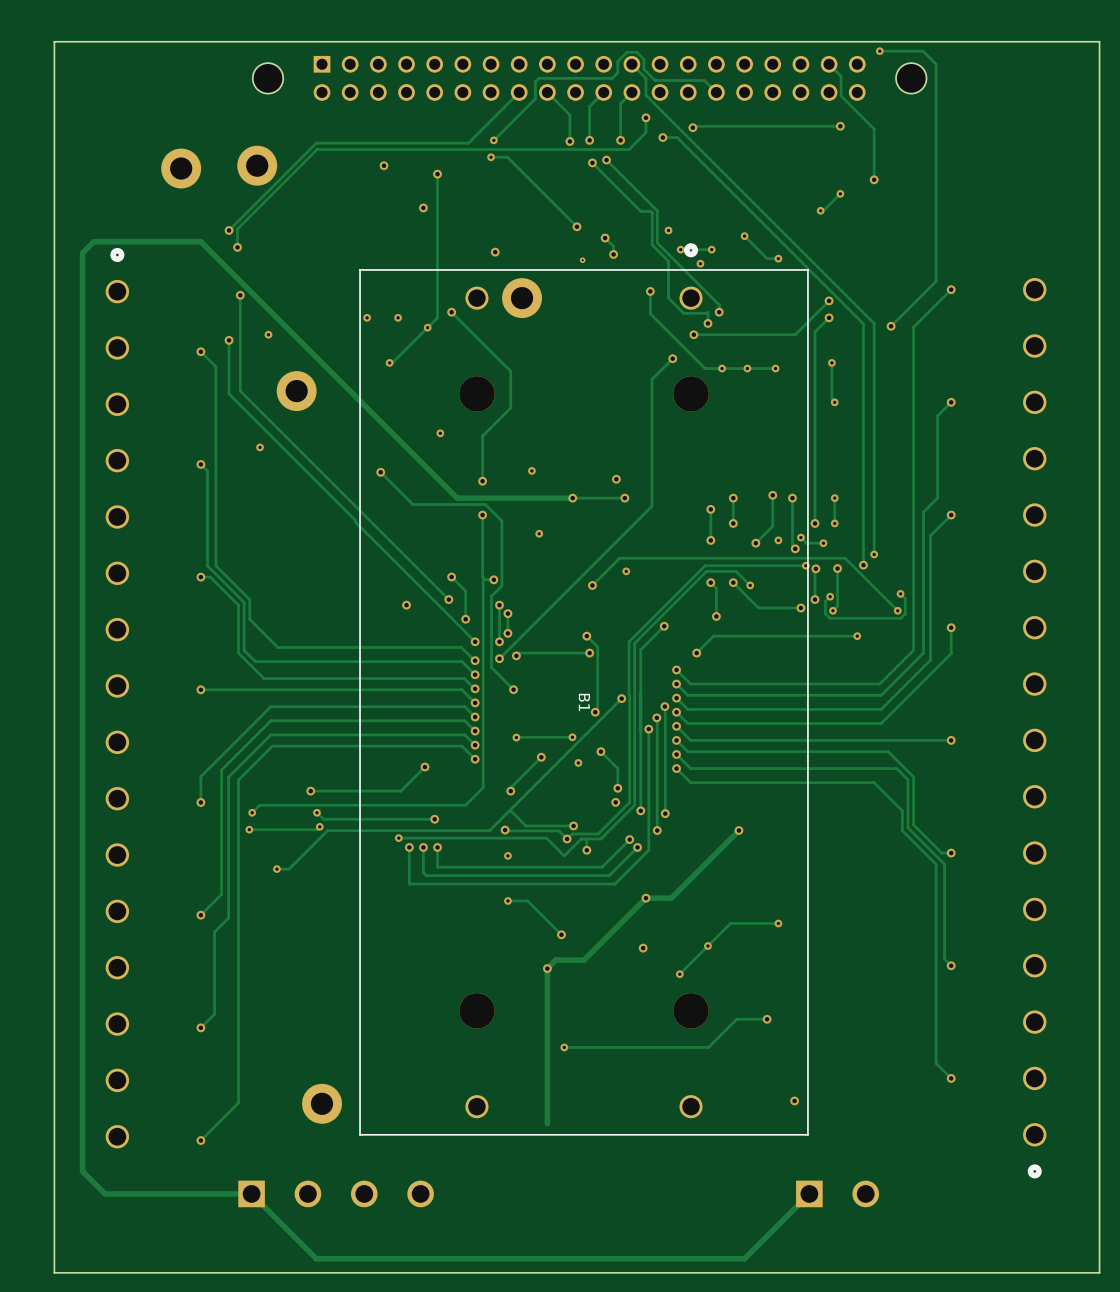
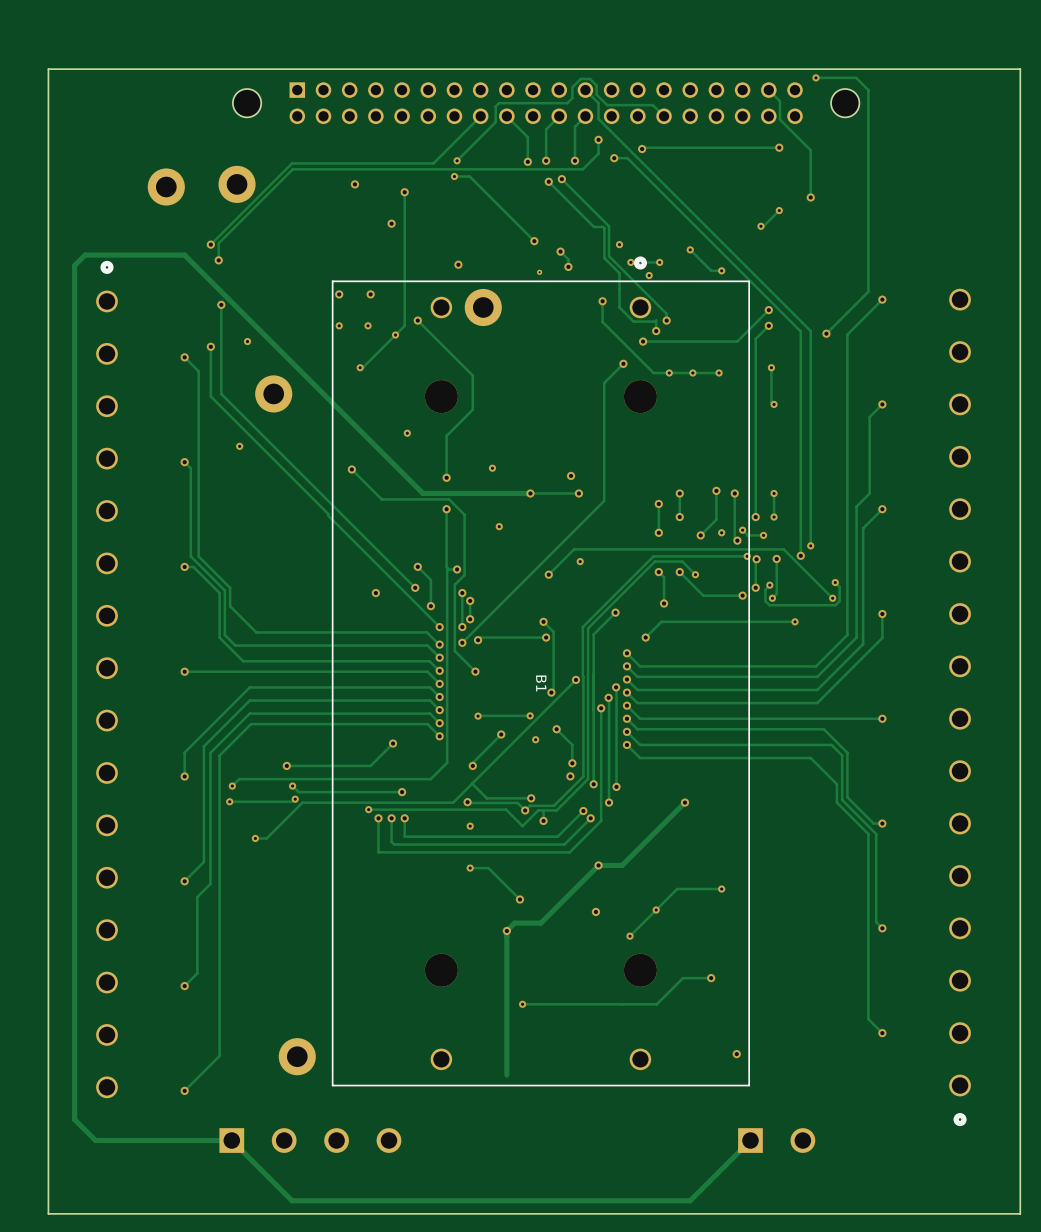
via: none -> (339, 294)
via: none -> (370, 294)

